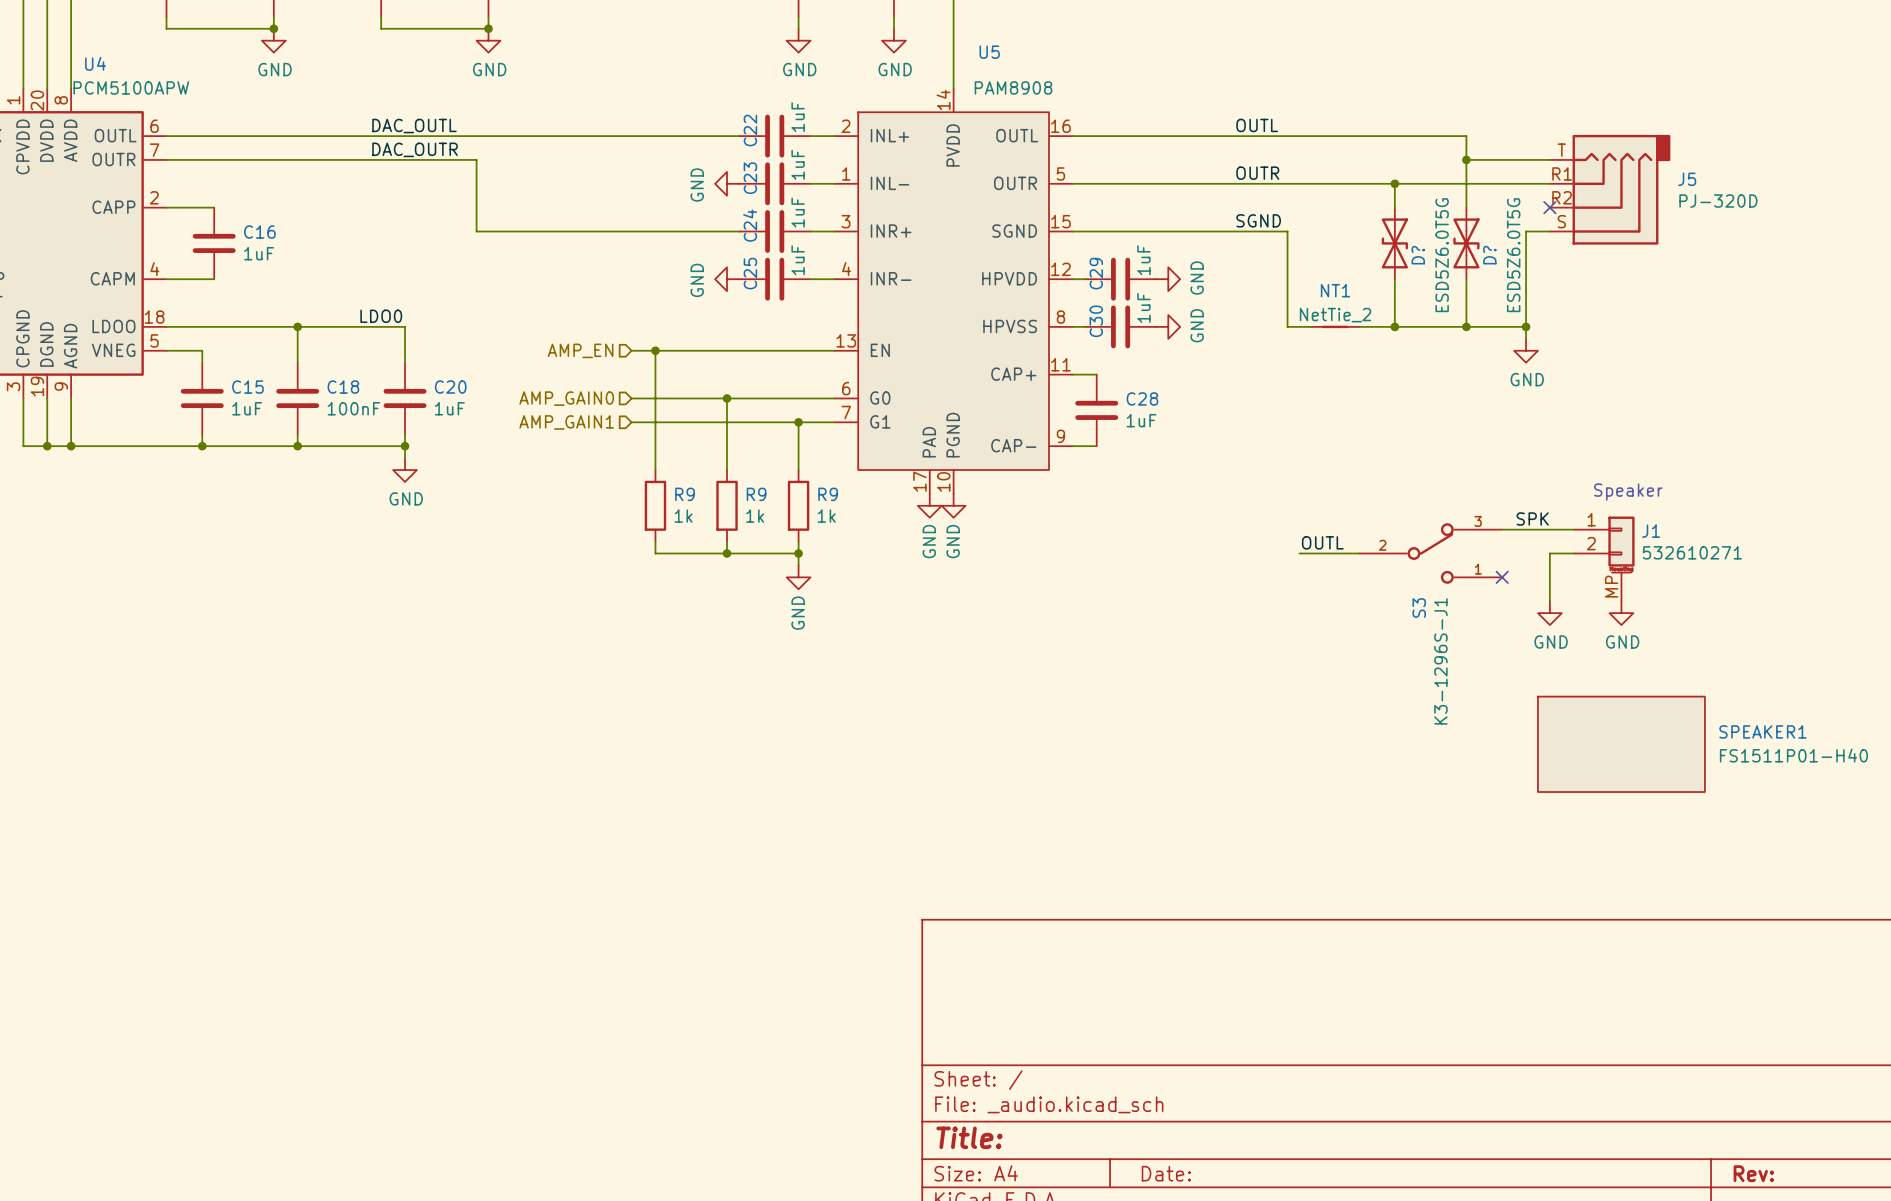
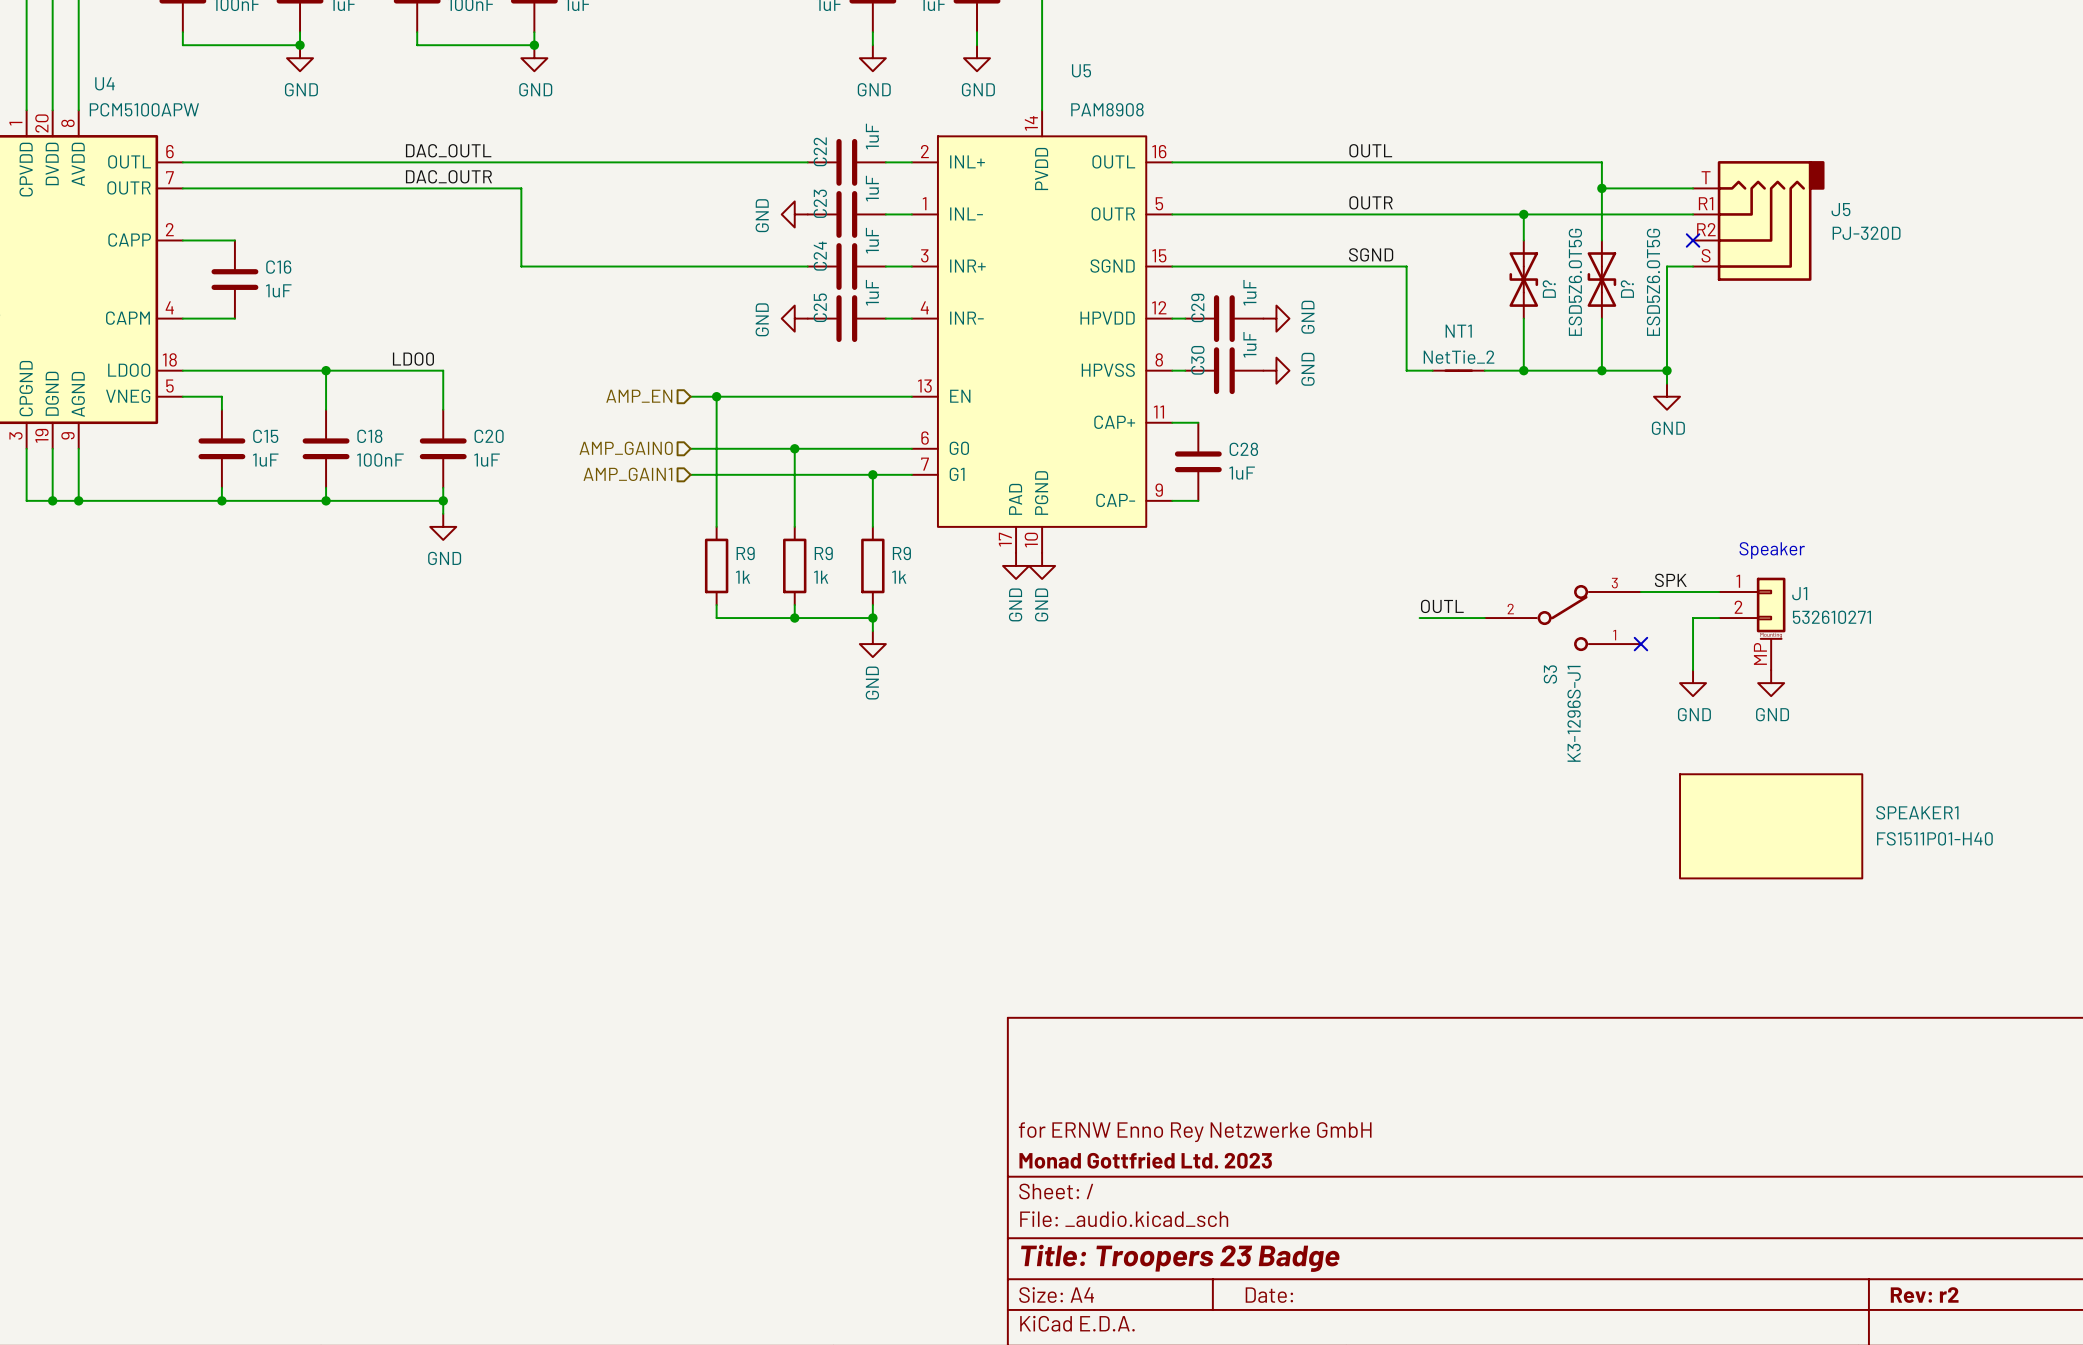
title block: none -> for ERNW Enno Rey Netzwerke GmbH (1195, 1132)
title block: none -> Monad Gottfried Ltd. 2023 (1145, 1160)
title block: Title: (969, 1137) -> Title: Troopers 23 Badge (1180, 1258)
title block: Rev: (1753, 1173) -> Rev: r2 (1924, 1295)

